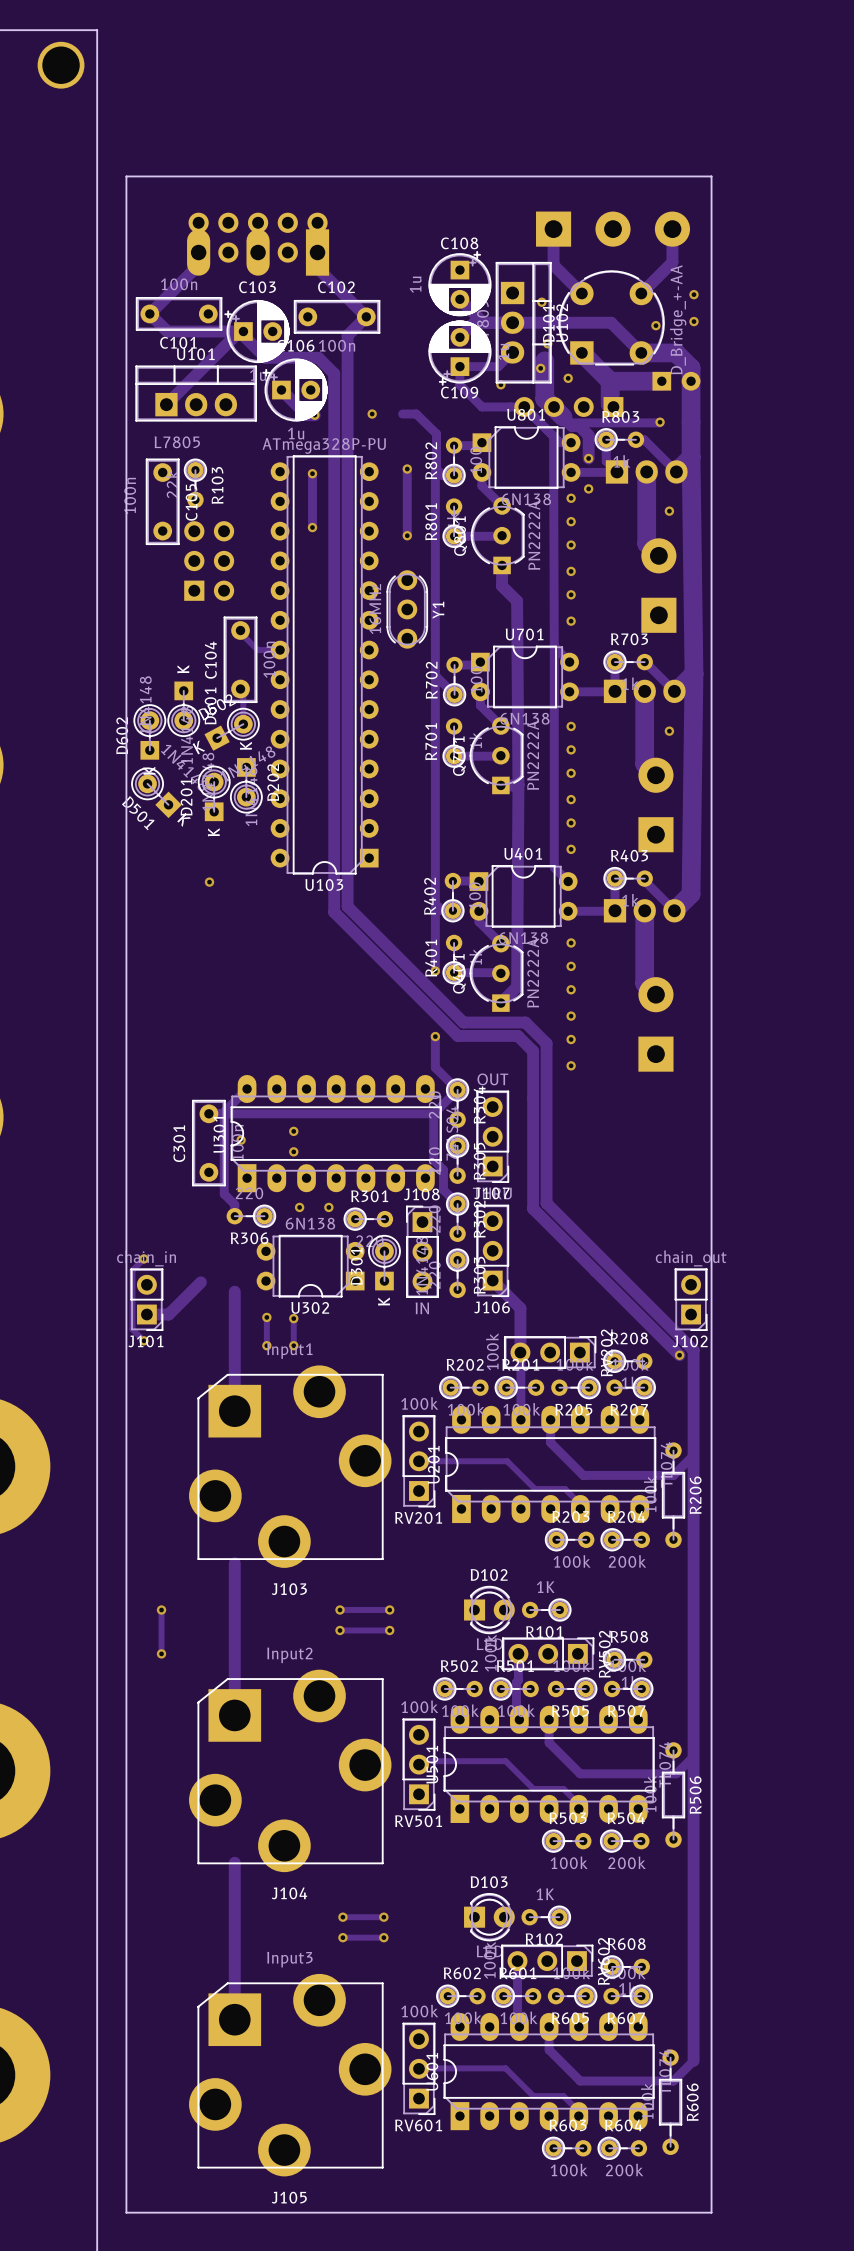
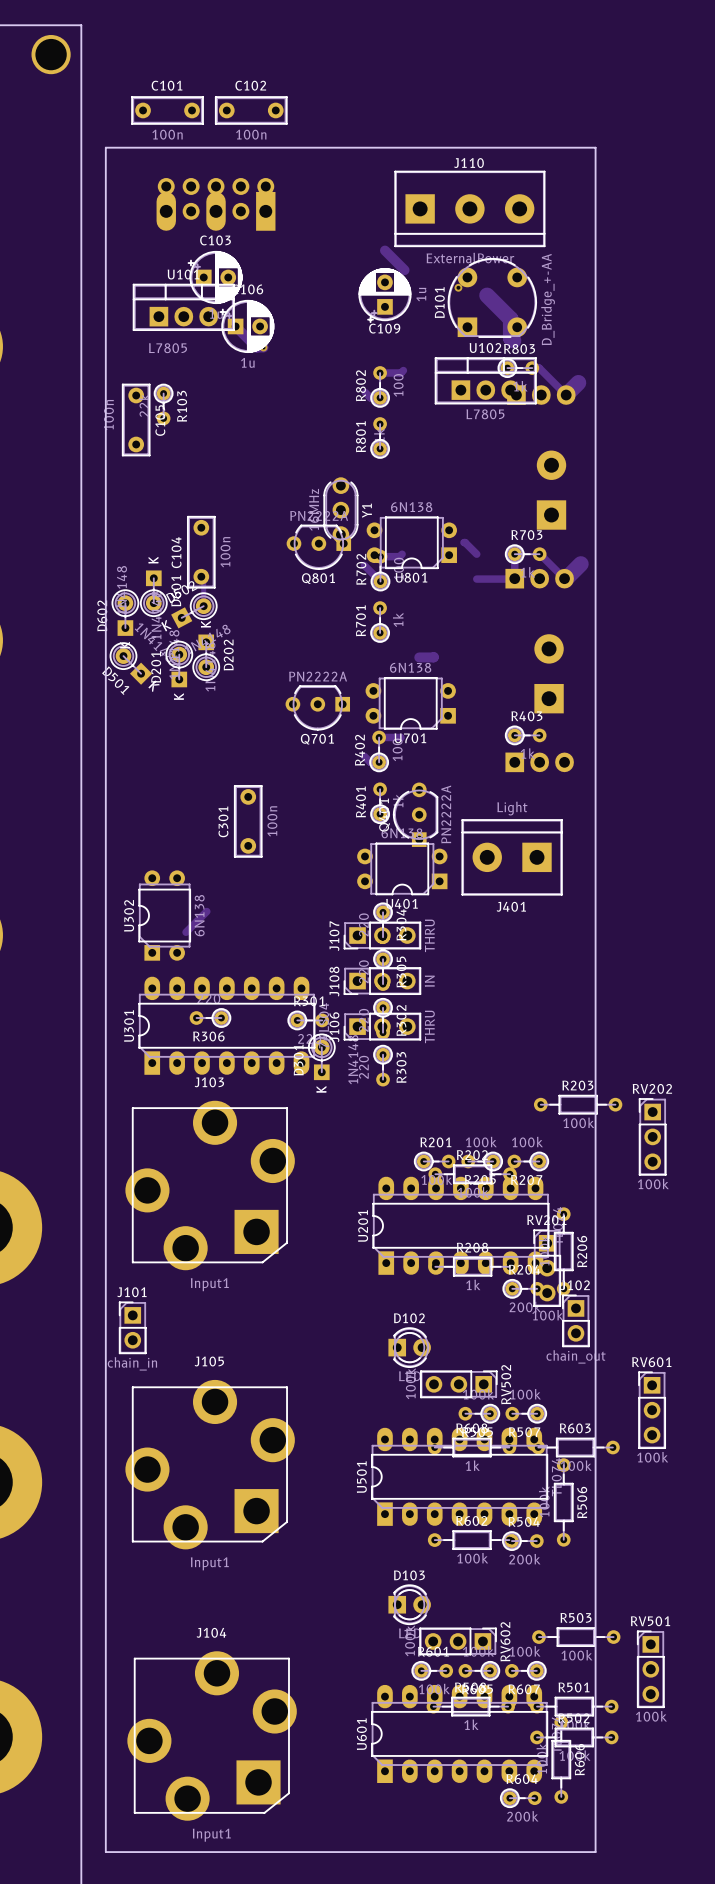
track: (198, 222) (198, 265) (149, 313) (167, 331) (243, 331) (243, 335) (265, 357) (318, 357) (334, 373) (334, 912) (457, 1035) (517, 1035) (533, 1051) (533, 1208) (679, 1355) -> none
track: (317, 222) (317, 268) (366, 316) (347, 335) (347, 906) (463, 1022) (525, 1022) (546, 1043) (546, 1203) (693, 1350) (693, 2060) (673, 2081) (580, 2081) (549, 2049) (549, 2026) -> none
track: (553, 229) (553, 265) (581, 293) -> none
J110 side: bottom (613, 229) -> top (469, 208)
track: (672, 229) (672, 262) (641, 293) -> none
C108: 1u (459, 283) -> none
C101 value position: 100n (179, 284) -> 100n (167, 134)
via: (693, 294) -> none
via: (541, 302) -> none
C101 position: (179, 313) -> (167, 110)
C102 position: (337, 316) -> (251, 110)
D101 position: (611, 317) -> (492, 297)
via: (693, 321) -> none
U102 rotation: 0° (523, 322) -> 90° counterclockwise (485, 380)
U102 position: (523, 322) -> (485, 380)
via: (655, 325) -> none
track: (239, 331) (166, 404) -> none
track: (459, 337) (474, 322) (611, 322) (641, 352) (675, 352) (691, 368) (693, 673) (691, 894) (674, 910) (644, 881) (644, 878) -> none
C101 name position: C101 (178, 342) -> C101 (167, 85)
track: (512, 352) (498, 366) (459, 366) (459, 384) (482, 406) (524, 406) (560, 442) (571, 442) -> none
track: (544, 360) (544, 398) (571, 425) (579, 425) (588, 435) (588, 458) -> none
via: (540, 368) -> none
via: (568, 378) -> none
track: (610, 381) (661, 381) -> none
part: (676, 381) -> none
via: (500, 384) -> none
U101 position: (196, 393) -> (183, 307)
track: (554, 406) (569, 422) (660, 422) -> none
part: (568, 406) -> none
via: (372, 414) -> none
track: (402, 414) (416, 414) (436, 433) (435, 971) -> none
via: (660, 422) -> none
track: (553, 436) (554, 867) (568, 881) -> none
track: (606, 439) (606, 461) (616, 472) (571, 472) -> none
U801 rotation: 0° (526, 457) -> 180° (411, 542)
U801 position: (526, 457) -> (411, 542)
via: (588, 458) -> none
track: (407, 469) (407, 535) -> none
via: (407, 469) -> none
track: (646, 471) (646, 543) (658, 555) -> none
track: (481, 472) (481, 485) (502, 505) -> none
track: (312, 473) (312, 527) -> none
via: (312, 473) -> none
via: (588, 488) -> none
via: (571, 498) -> none
via: (669, 511) -> none
via: (571, 521) -> none
via: (312, 527) -> none
via: (407, 535) -> none
Q801 rotation: 0° (497, 535) -> 90° counterclockwise (318, 547)
Q801 position: (497, 535) -> (318, 547)
track: (502, 535) (454, 536) -> none
via: (571, 545) -> none
part: (209, 560) -> none
track: (502, 565) (502, 586) (517, 601) (518, 784) (517, 986) (500, 1003) -> none
via: (571, 571) -> none
via: (571, 594) -> none
via: (571, 621) -> none
track: (240, 632) (257, 650) (280, 650) -> none
U103: ATmega328P-PU (324, 664) -> none
U701 rotation: 0° (525, 676) -> 180° (410, 703)
U701 position: (525, 676) -> (410, 703)
track: (480, 691) (480, 705) (500, 726) -> none
track: (644, 691) (644, 764) (655, 775) -> none
via: (571, 726) -> none
via: (669, 731) -> none
via: (571, 749) -> none
Q701 rotation: 0° (496, 755) -> 90° counterclockwise (317, 707)
Q701 position: (496, 755) -> (317, 707)
track: (500, 755) (454, 756) -> none
via: (571, 773) -> none
via: (571, 799) -> none
via: (571, 823) -> none
via: (571, 849) -> none
track: (615, 878) (614, 911) (568, 911) -> none
via: (209, 882) -> none
U401 rotation: 0° (523, 896) -> 180° (402, 868)
U401 position: (523, 896) -> (402, 868)
track: (644, 910) (644, 983) (655, 994) -> none
track: (479, 911) (479, 921) (500, 943) -> none
via: (571, 942) -> none
via: (571, 966) -> none
via: (435, 971) -> none
track: (454, 972) (500, 973) -> none
via: (571, 989) -> none
via: (571, 1016) -> none
J401 side: bottom (655, 1024) -> top (512, 857)
track: (435, 1036) (435, 1067) (457, 1089) (433, 1113) -> none
via: (435, 1036) -> none
via: (571, 1039) -> none
via: (571, 1065) -> none
J107 value: OUT (492, 1079) -> THRU (429, 935)
track: (208, 1113) (433, 1113) -> none
track: (222, 1113) (224, 1115) (224, 1194) (234, 1204) (234, 1216) -> none
track: (433, 1113) (433, 1160) (443, 1169) (443, 1189) (457, 1204) -> none
via: (293, 1131) -> none
U301 position: (336, 1133) -> (226, 1025)
J107 rotation: 0° (492, 1136) -> 90° clockwise (382, 935)
via: (241, 1140) -> none
C301 position: (208, 1143) -> (248, 821)
via: (293, 1151) -> none
via: (299, 1207) -> none
via: (328, 1207) -> none
J106 rotation: 0° (492, 1250) -> 90° clockwise (382, 1026)
J108 rotation: 0° (422, 1251) -> 90° counterclockwise (382, 981)
J108 position: (422, 1251) -> (382, 981)
track: (143, 1258) (132, 1270) (132, 1329) (143, 1340) -> none
via: (143, 1258) -> none
U302 rotation: 0° (310, 1266) -> 90° clockwise (164, 915)
U302 position: (310, 1266) -> (164, 915)
track: (492, 1280) (520, 1308) (520, 1419) -> none
track: (200, 1282) (168, 1314) (146, 1314) -> none
track: (234, 1291) (234, 1411) -> none
J101 rotation: 0° (146, 1299) -> 180° (132, 1327)
J101 position: (146, 1299) -> (132, 1327)
J102 rotation: 0° (691, 1299) -> 180° (575, 1320)
J102 position: (691, 1299) -> (575, 1320)
track: (266, 1317) (266, 1345) -> none
via: (266, 1317) -> none
track: (293, 1318) (293, 1345) -> none
via: (293, 1318) -> none
via: (143, 1340) -> none
via: (266, 1345) -> none
via: (293, 1345) -> none
R208 footprint: [603, 1349, 653, 1373] -> [428, 1257, 517, 1277]
RV202 rotation: 0° (550, 1352) -> 90° counterclockwise (652, 1136)
RV202 position: (550, 1352) -> (652, 1136)
via: (679, 1355) -> none
R202 footprint: [439, 1376, 489, 1400] -> [428, 1164, 517, 1184]
track: (550, 1419) (550, 1442) (583, 1475) (673, 1475) (693, 1454) -> none
track: (418, 1461) (507, 1461) (534, 1489) (565, 1489) (580, 1504) (580, 1509) -> none
RV201 rotation: 0° (418, 1461) -> 180° (547, 1268)
RV201 position: (418, 1461) -> (547, 1268)
J103 rotation: 0° (290, 1466) -> 180° (210, 1185)
R203 footprint: [545, 1528, 595, 1552] -> [533, 1095, 623, 1115]
track: (234, 1563) (234, 1715) -> none
track: (161, 1610) (161, 1653) -> none
via: (161, 1610) -> none
track: (339, 1610) (389, 1610) -> none
via: (339, 1610) -> none
via: (389, 1610) -> none
R101: 1K (546, 1610) -> none
track: (339, 1630) (389, 1630) -> none
via: (339, 1630) -> none
via: (389, 1630) -> none
R508 footprint: [603, 1648, 653, 1672] -> [426, 1697, 515, 1717]
via: (161, 1653) -> none
track: (518, 1653) (516, 1716) (519, 1719) -> none
J104 value: Input2 (289, 1655) -> Input1 (211, 1835)
R502 footprint: [433, 1677, 483, 1701] -> [530, 1727, 619, 1748]
R501 footprint: [489, 1677, 539, 1701] -> [530, 1697, 619, 1717]
track: (549, 1719) (549, 1742) (580, 1773) (676, 1773) (693, 1756) -> none
track: (417, 1761) (505, 1761) (533, 1788) (563, 1788) (578, 1804) (578, 1808) -> none
RV501 rotation: 0° (418, 1764) -> 180° (650, 1669)
RV501 position: (418, 1764) -> (650, 1669)
J104 rotation: 0° (290, 1770) -> 180° (212, 1735)
J104 position: (290, 1770) -> (212, 1735)
R503 footprint: [542, 1829, 592, 1853] -> [532, 1627, 621, 1647]
track: (234, 1862) (234, 2020) -> none
track: (342, 1917) (383, 1917) -> none
via: (342, 1917) -> none
via: (383, 1917) -> none
R102: 1K (546, 1917) -> none
track: (342, 1937) (383, 1937) -> none
via: (342, 1937) -> none
via: (383, 1937) -> none
R608 footprint: [600, 1955, 650, 1979] -> [427, 1437, 517, 1458]
J105 value: Input3 (289, 1959) -> Input1 (209, 1563)
track: (517, 1961) (517, 2025) (519, 2026) -> none
R602 footprint: [436, 1984, 486, 2008] -> [427, 1530, 517, 1550]
track: (417, 2068) (505, 2068) (533, 2096) (563, 2096) (578, 2111) (578, 2116) -> none
RV601 rotation: 0° (418, 2068) -> 180° (652, 1410)
RV601 position: (418, 2068) -> (652, 1410)
J105 rotation: 0° (290, 2075) -> 180° (210, 1464)
J105 position: (290, 2075) -> (210, 1464)
R603 footprint: [542, 2136, 592, 2160] -> [531, 1437, 620, 1458]

